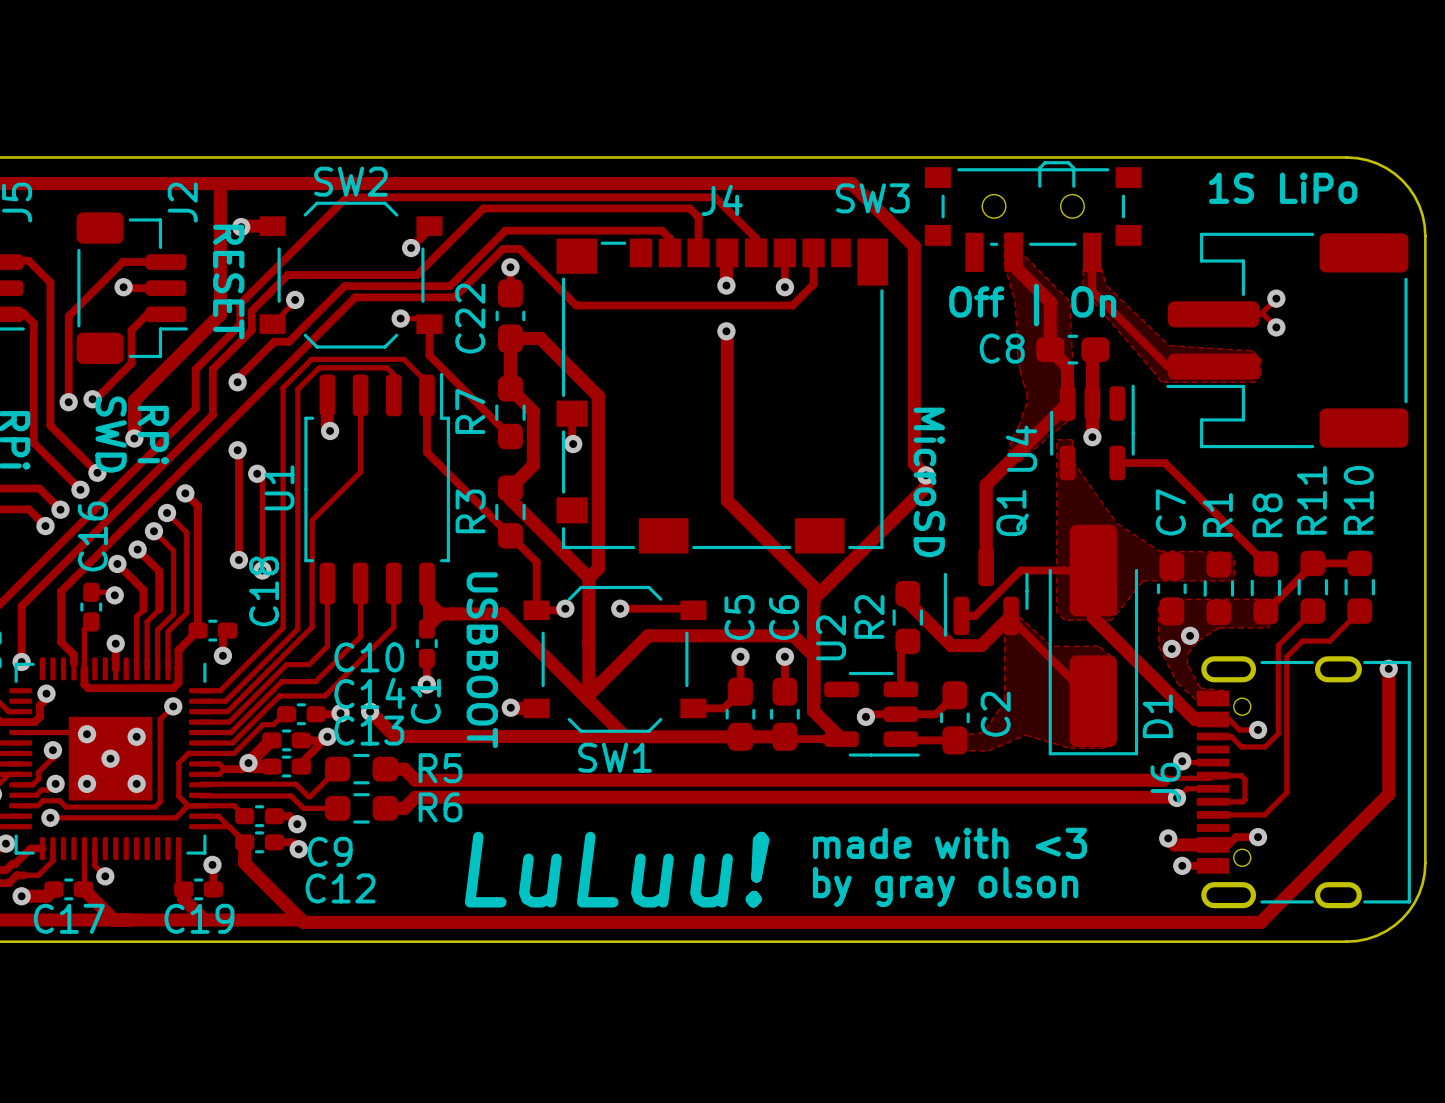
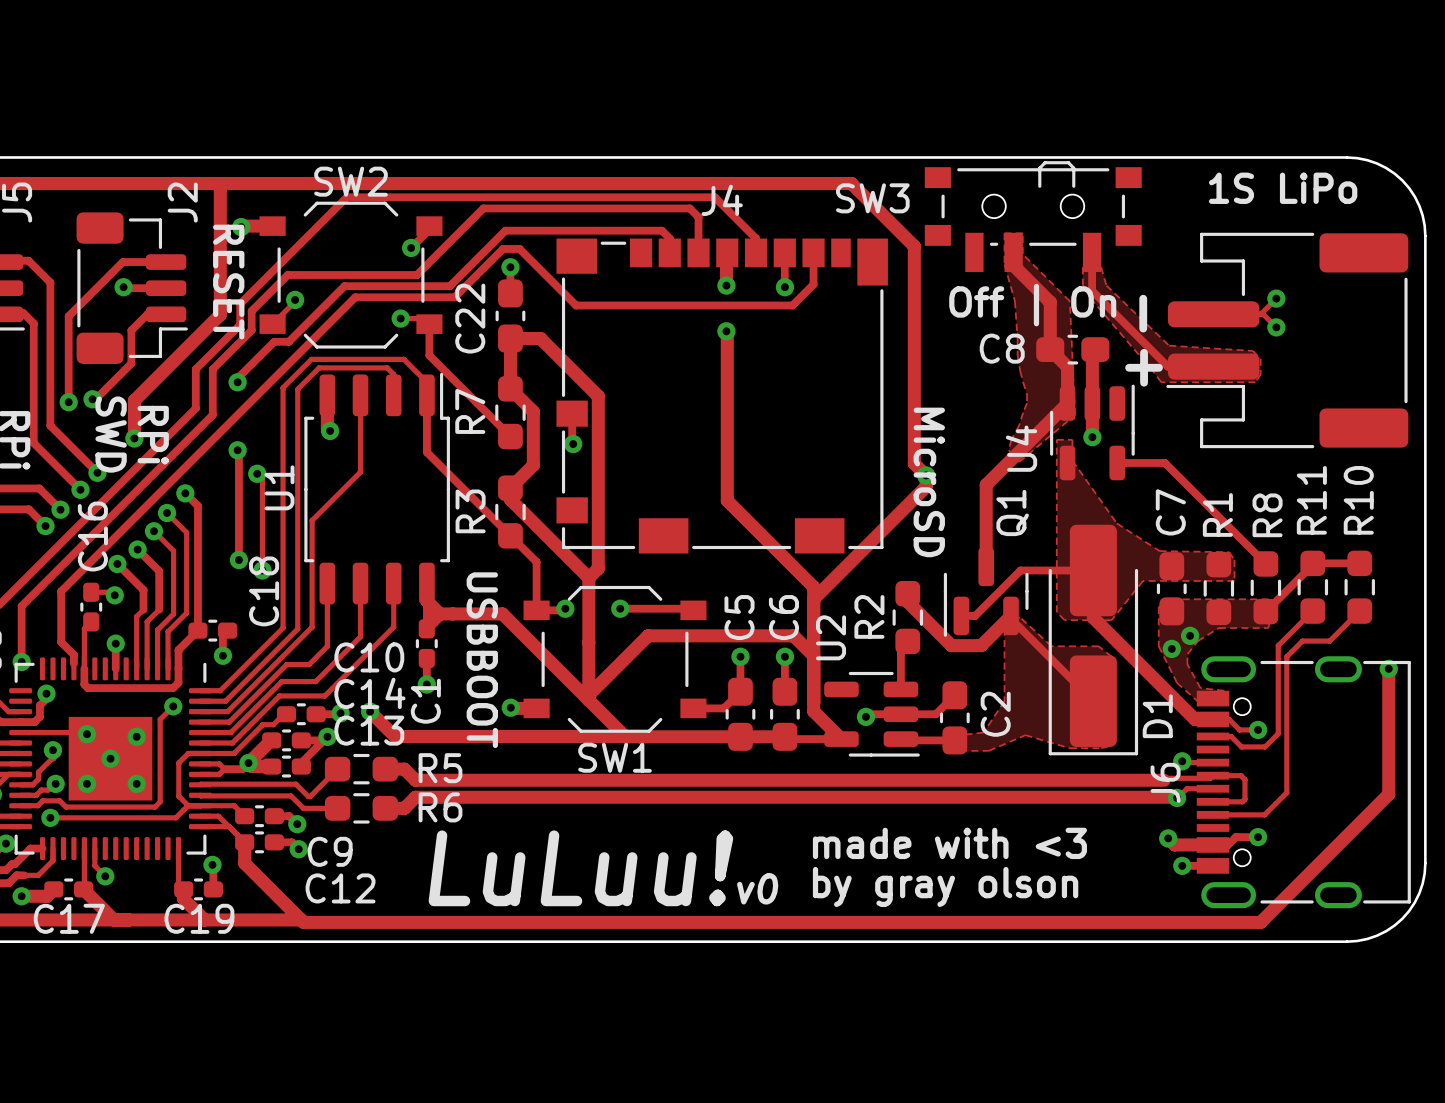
text: none -> - (1143, 313)
text: none -> + (1144, 367)
text position: LuLuu! (617, 869) -> LuLuu! (580, 868)
text: none -> v0 (757, 888)

